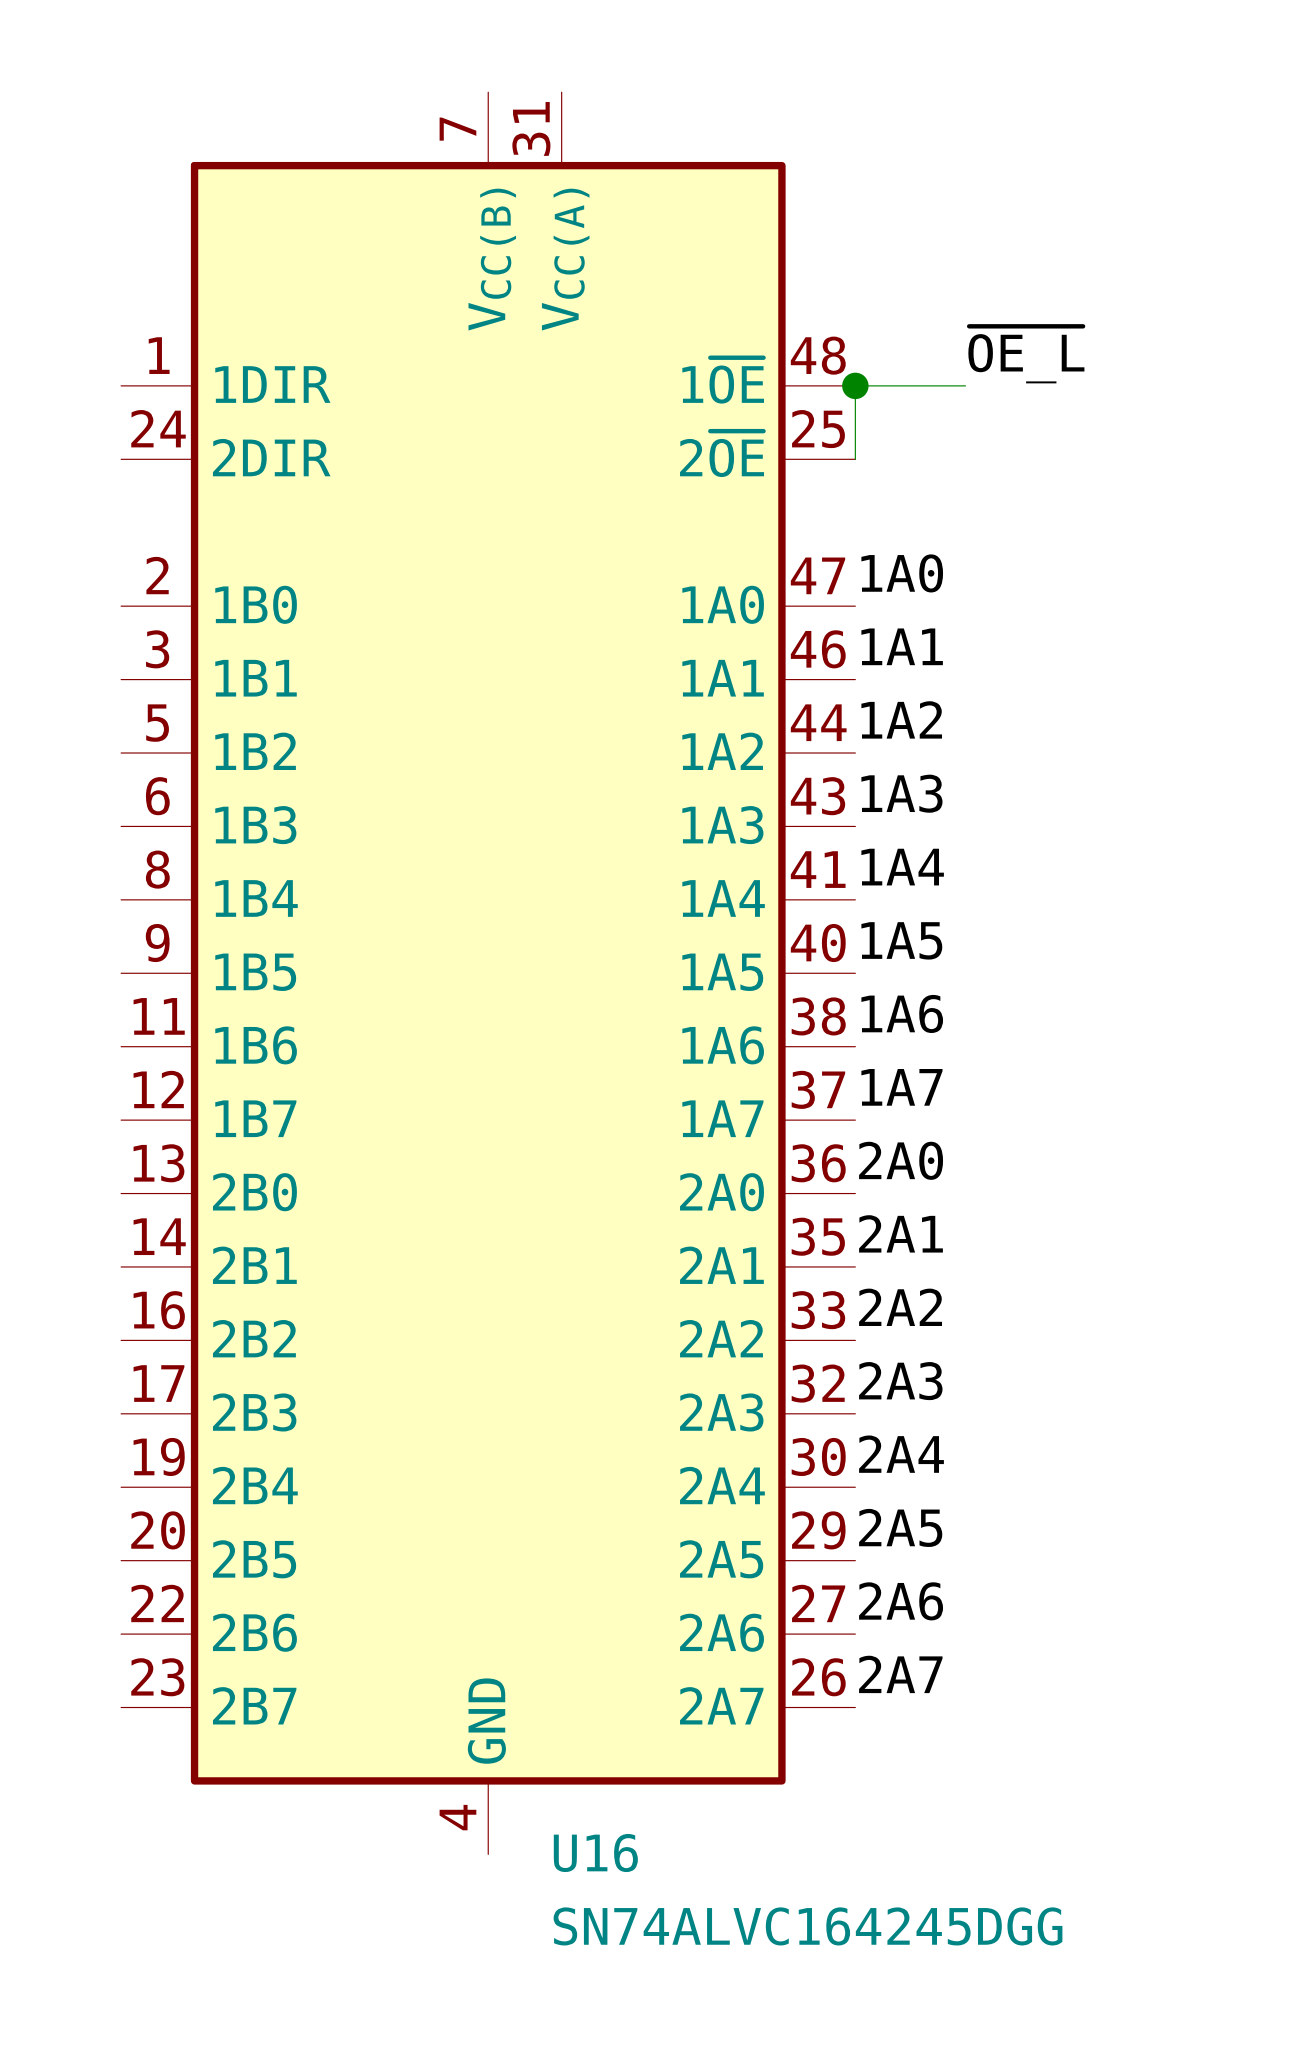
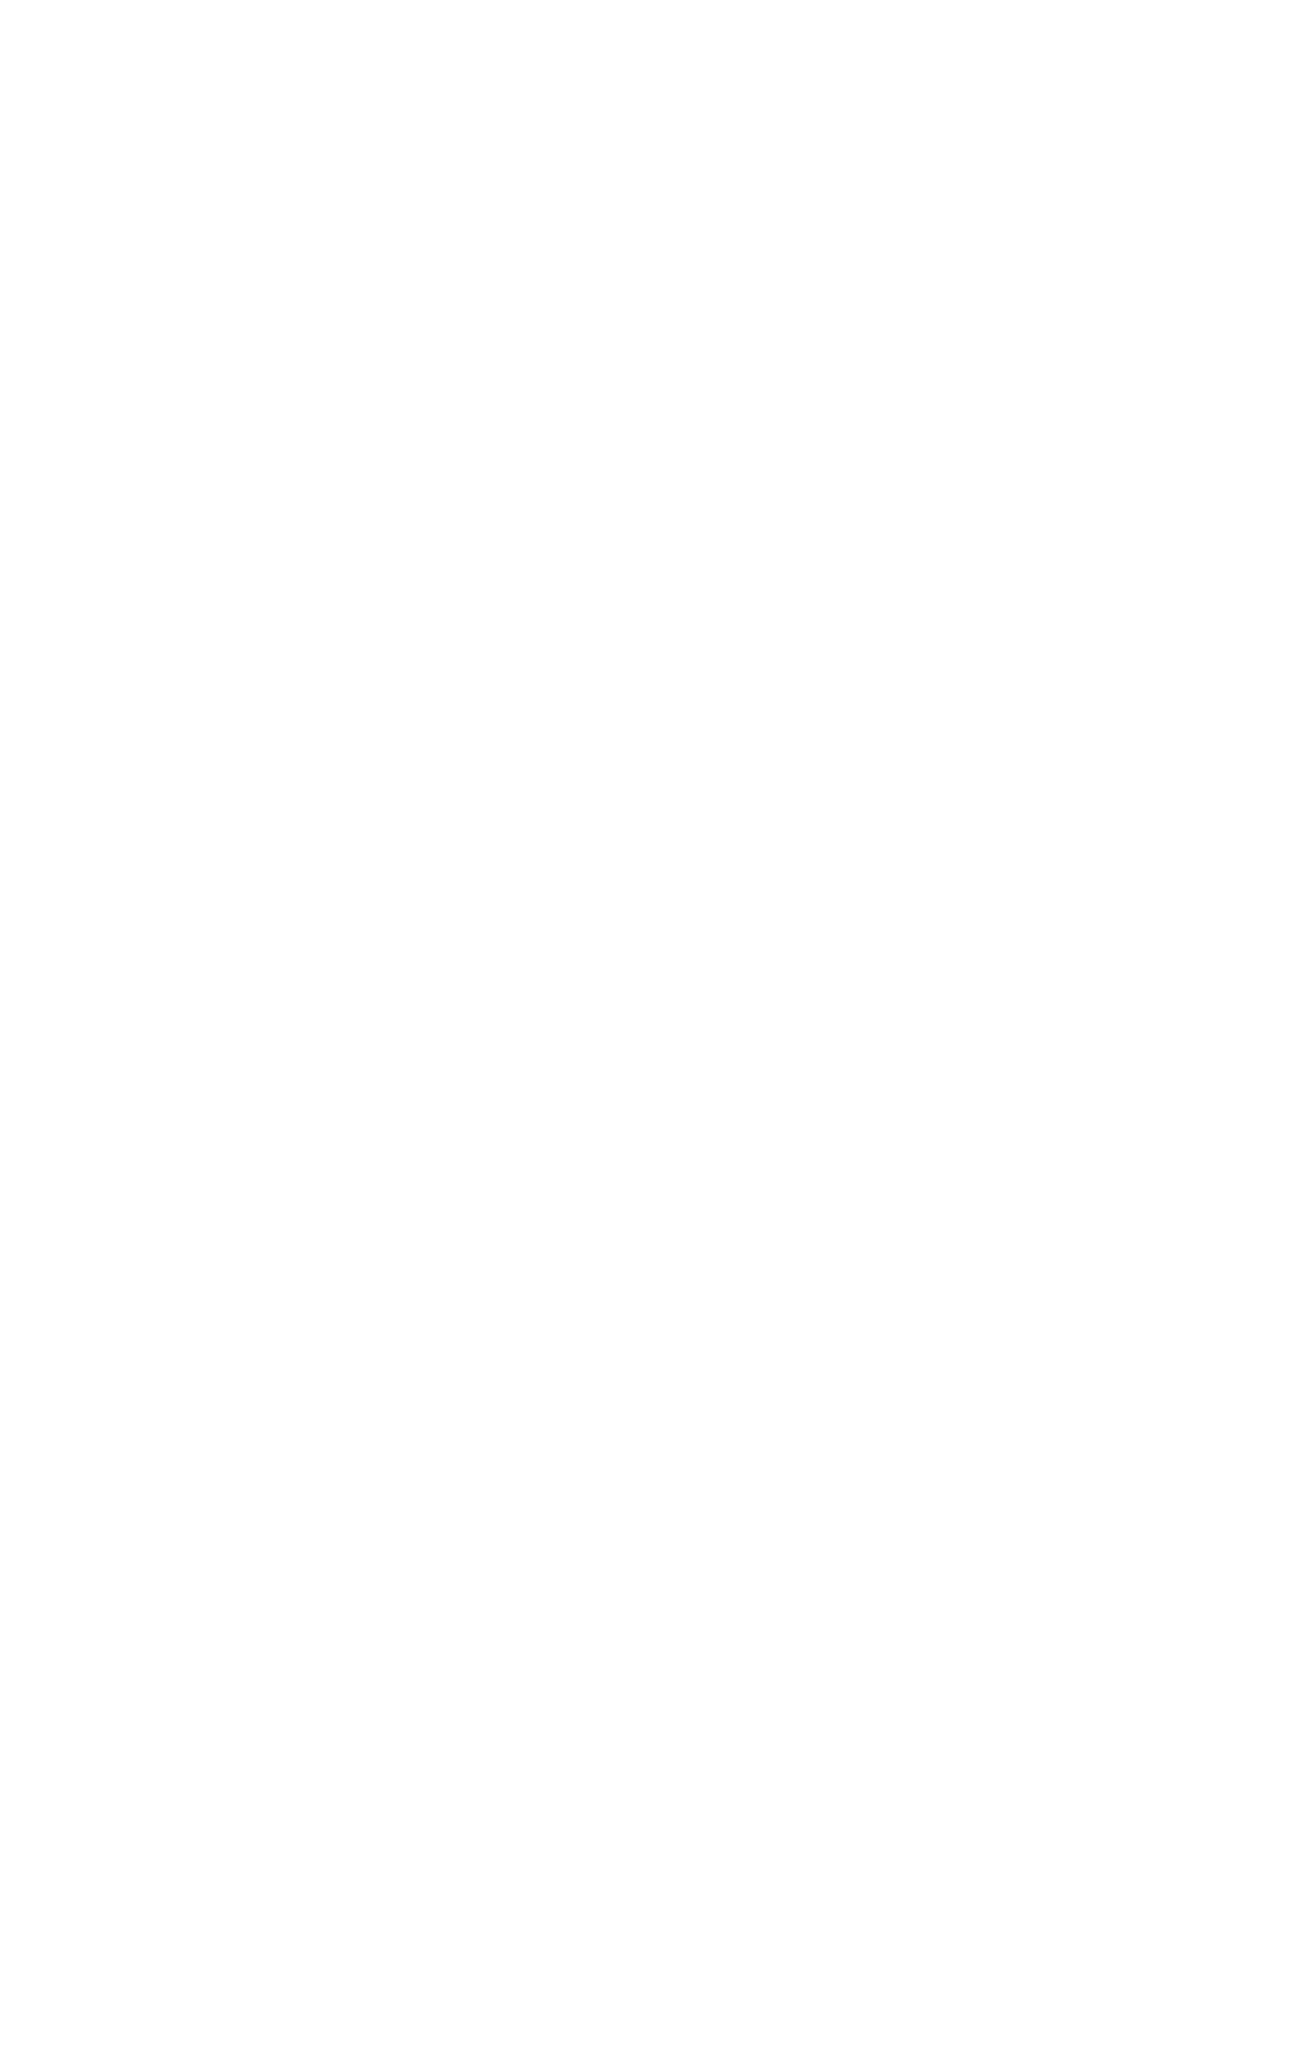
label: ~{OE_L} (1026, 354) -> none
junction: (855, 385) -> none
wire: (965, 385) (855, 385) (855, 459) -> none
label: 1A0 (902, 573) -> none
label: 1A1 (902, 646) -> none
label: 1A2 (901, 719) -> none
label: 1A3 (901, 793) -> none
label: 1A4 (902, 867) -> none
label: 1A5 (901, 940) -> none
U16: SN74ALVC164245DGG (488, 973) -> none
label: 1A6 (902, 1013) -> none
label: 1A7 (901, 1087) -> none
label: 2A0 (901, 1160) -> none
label: 2A1 (900, 1233) -> none
label: 2A2 (900, 1307) -> none
label: 2A3 (900, 1381) -> none
label: 2A4 (901, 1454) -> none
label: 2A5 (900, 1527) -> none
label: 2A6 (901, 1601) -> none
label: 2A7 (900, 1674) -> none

